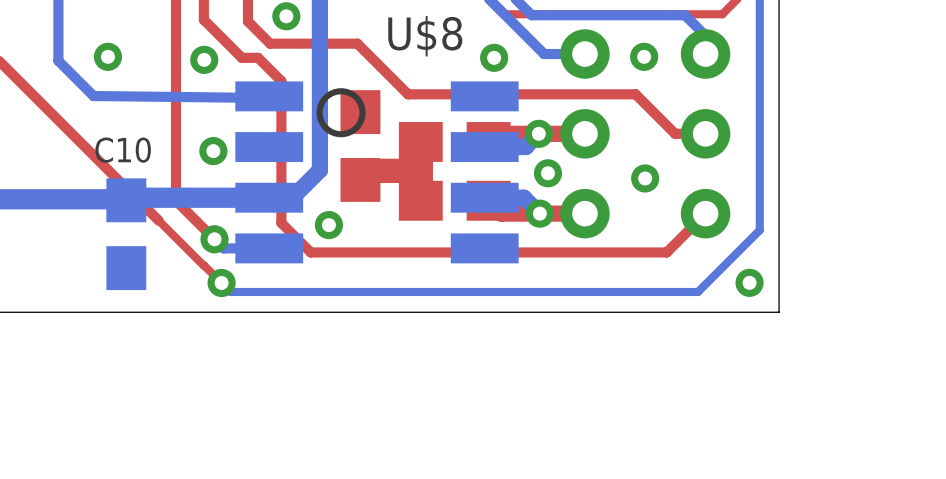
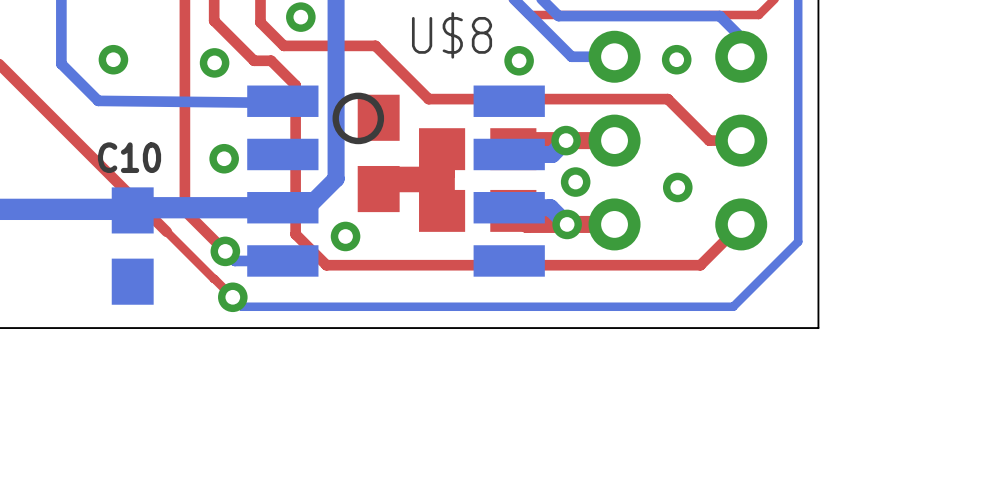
via: (749, 282) -> none

